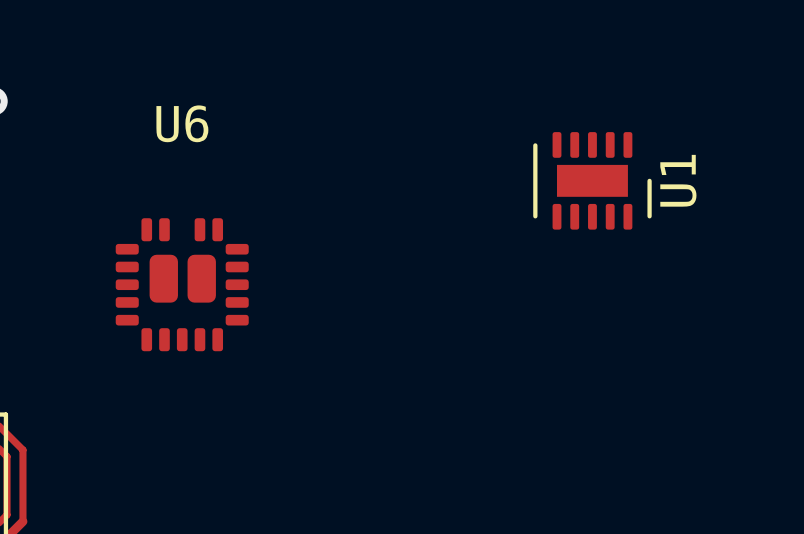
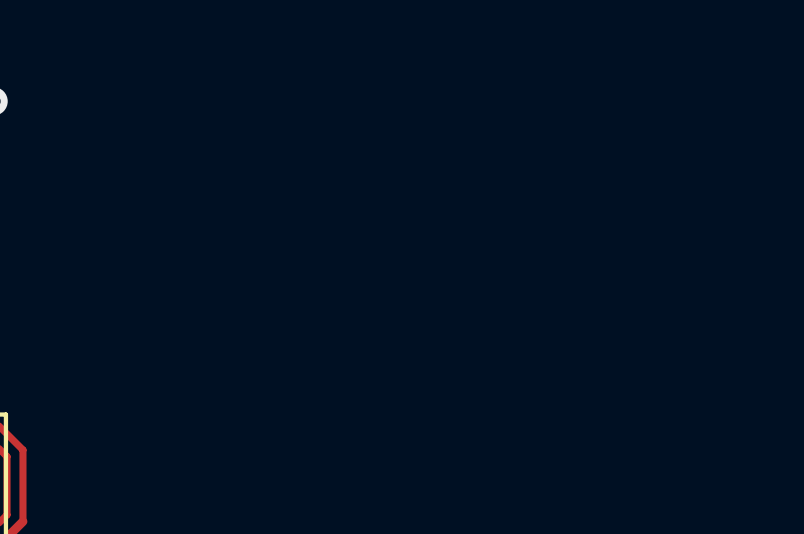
U1: (592, 180) -> none
U6: (182, 284) -> none

